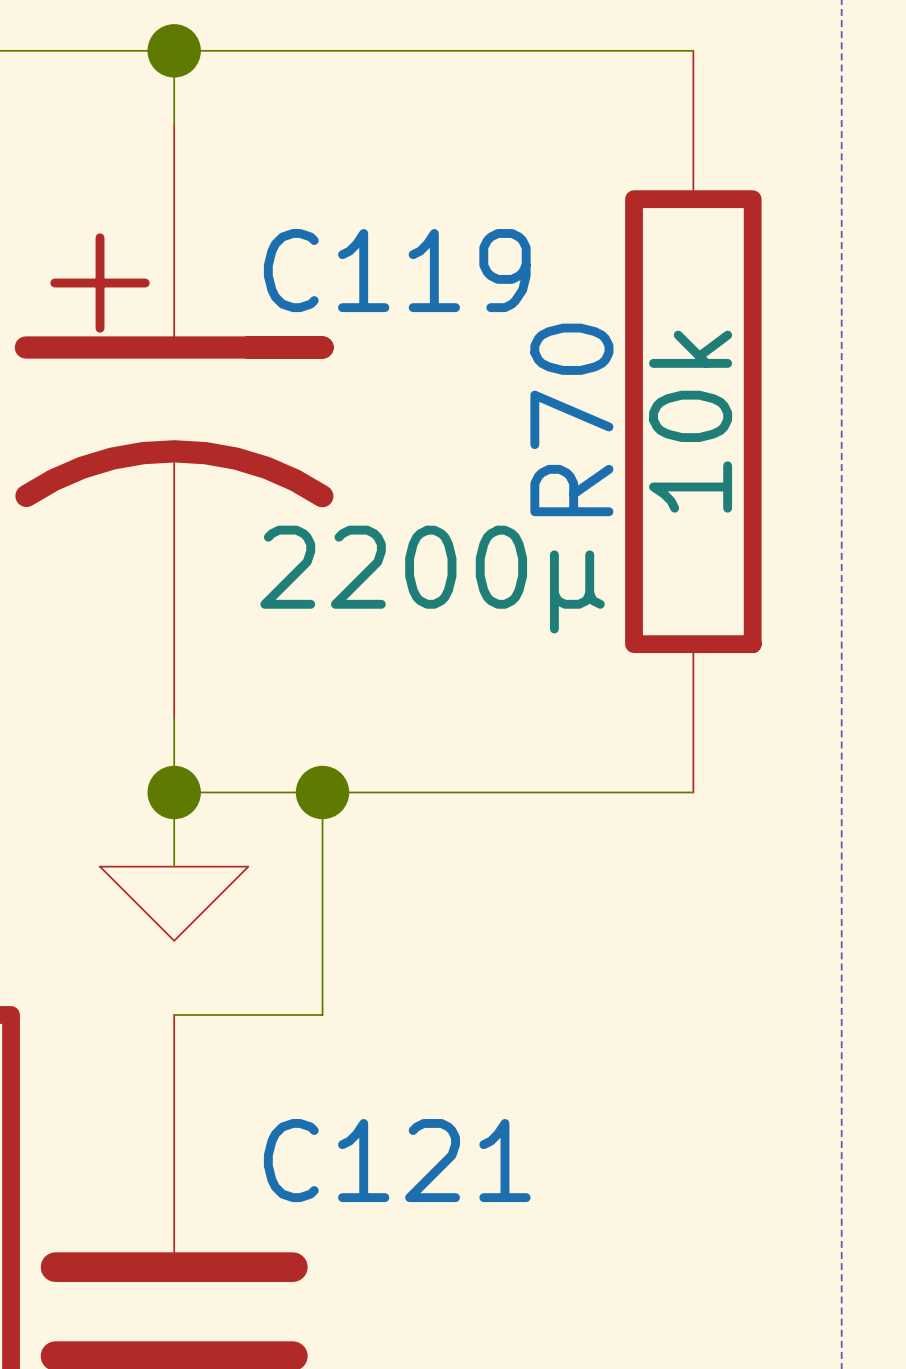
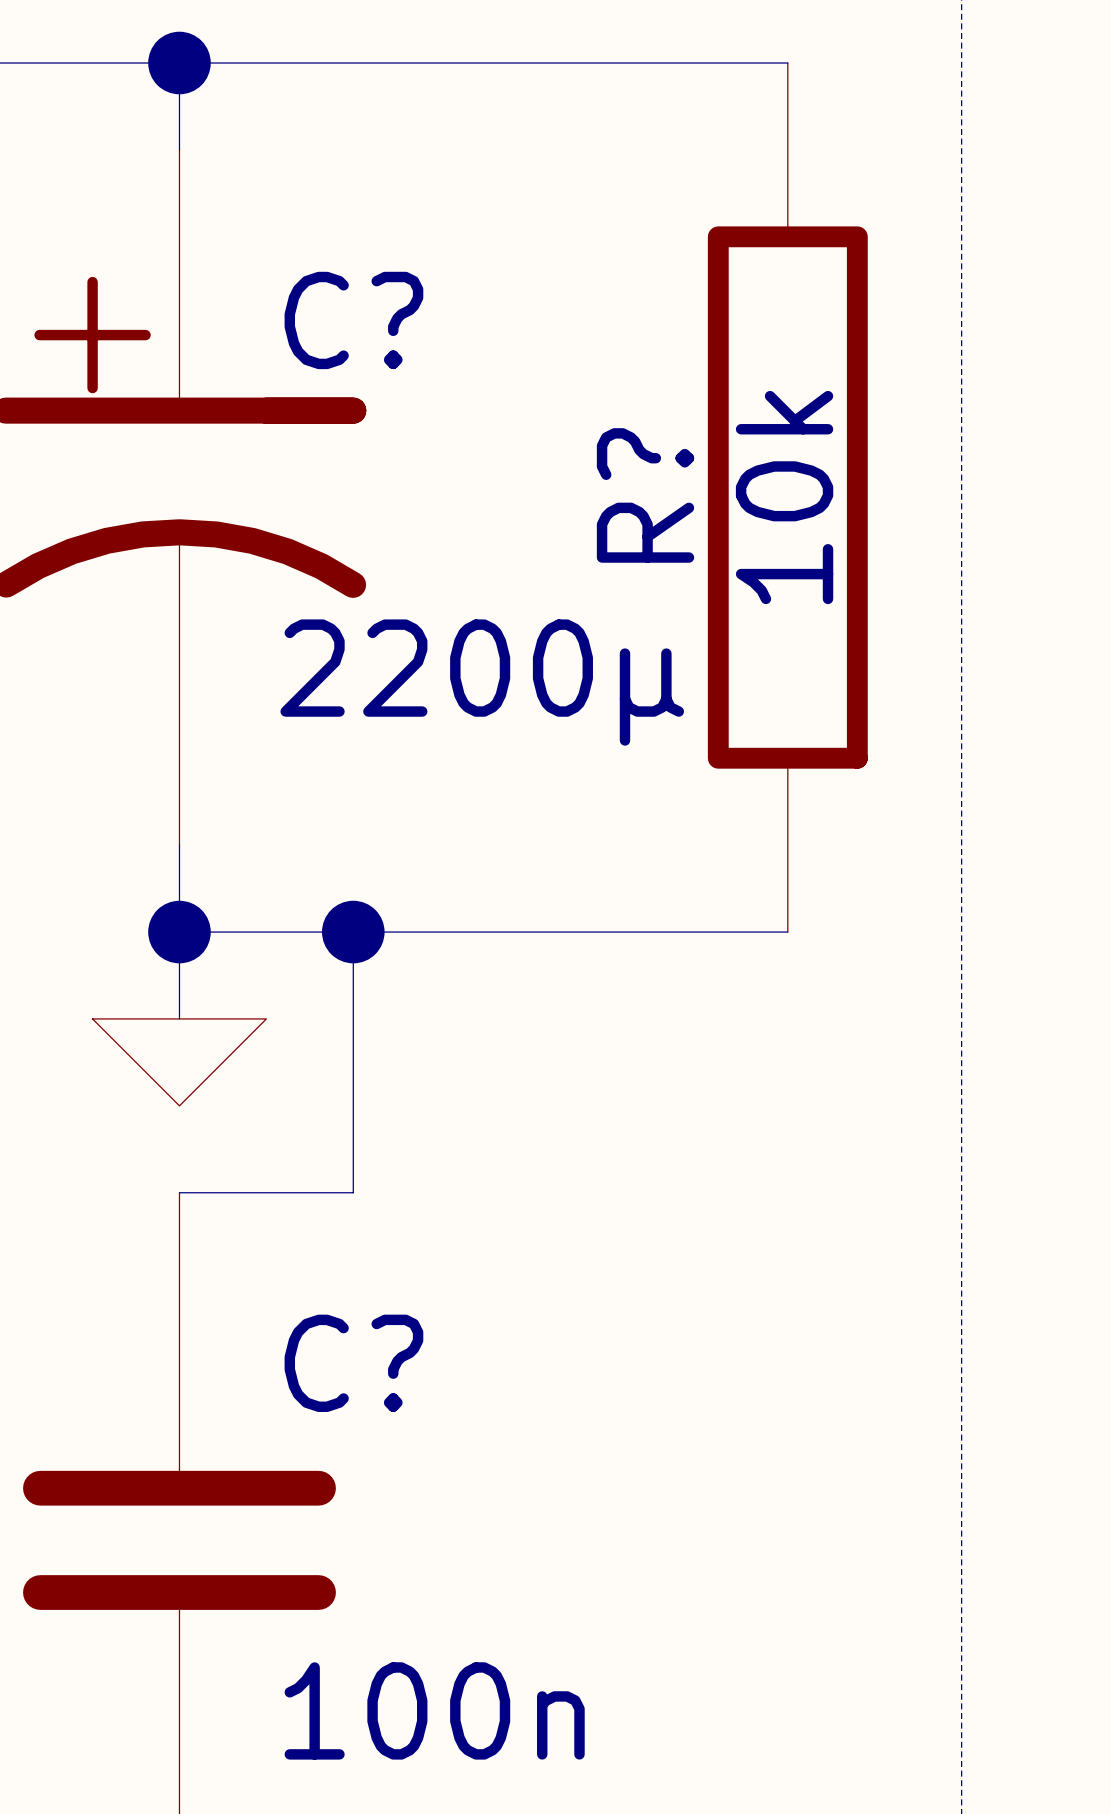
C119 name: C119 (397, 270) -> C? (353, 320)
R70 name: R70 (571, 419) -> R? (645, 495)
C121 name: C121 (397, 1160) -> C? (353, 1363)

